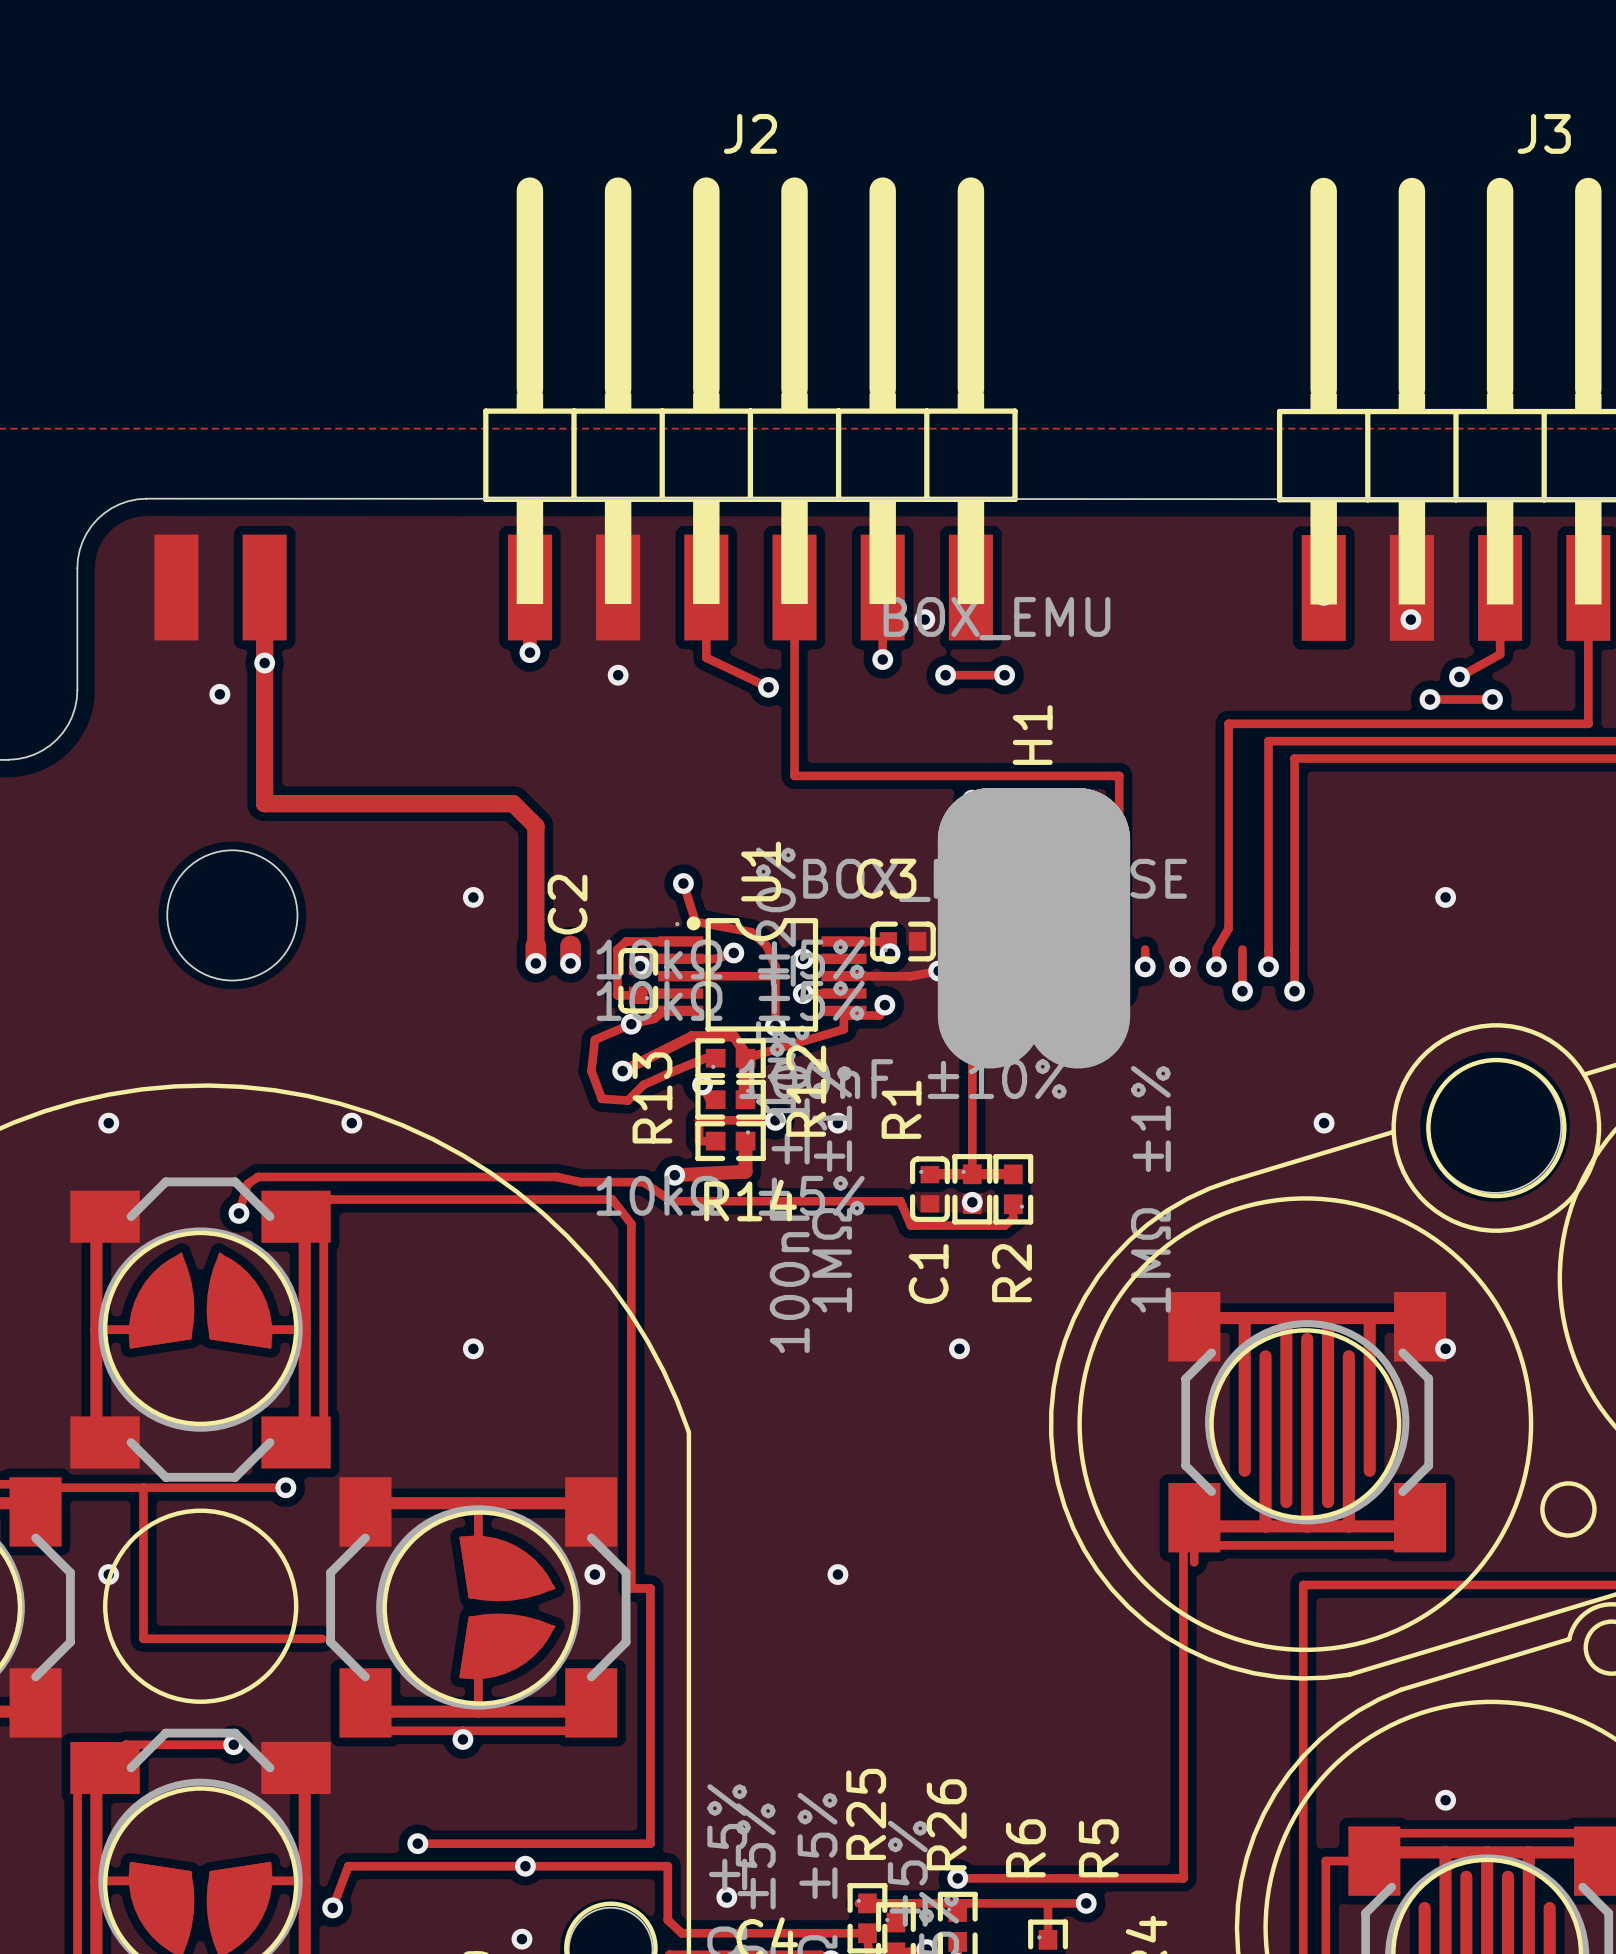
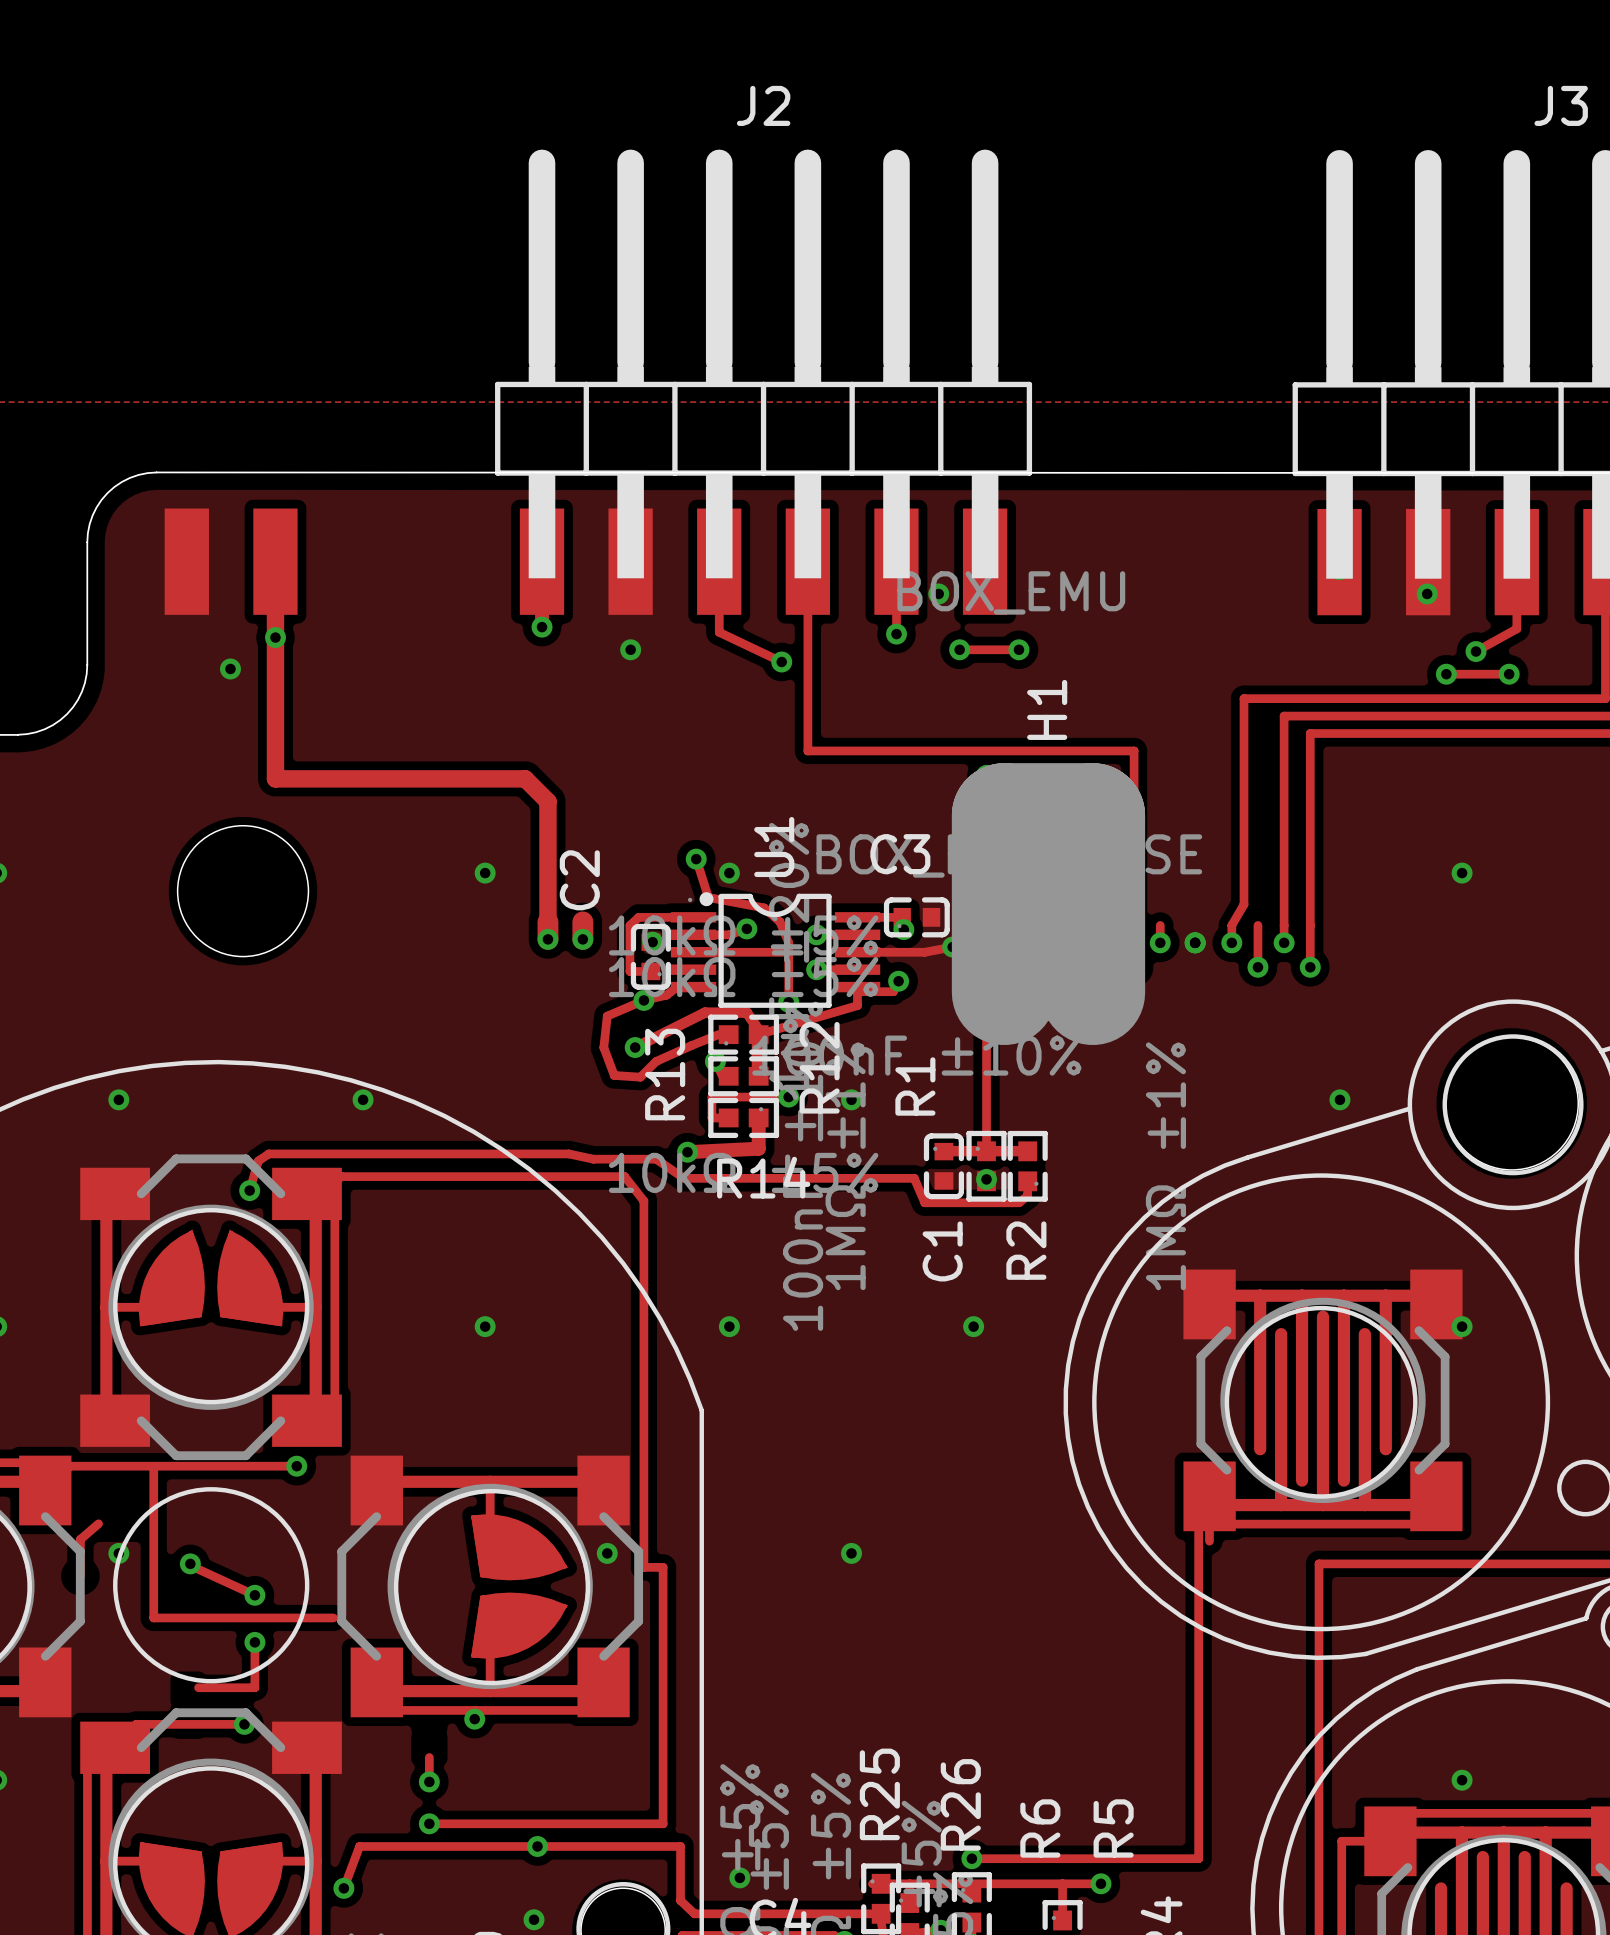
via: none -> (729, 873)
via: none -> (729, 1326)
track: none -> (98, 1523) (80, 1539) (80, 1576)
via: none -> (190, 1563)
track: none -> (190, 1565) (254, 1595)
via: none -> (254, 1595)
track: none -> (254, 1642) (254, 1687) (198, 1687)
via: none -> (254, 1642)
track: none -> (429, 1757) (429, 1781)
via: none -> (429, 1781)

